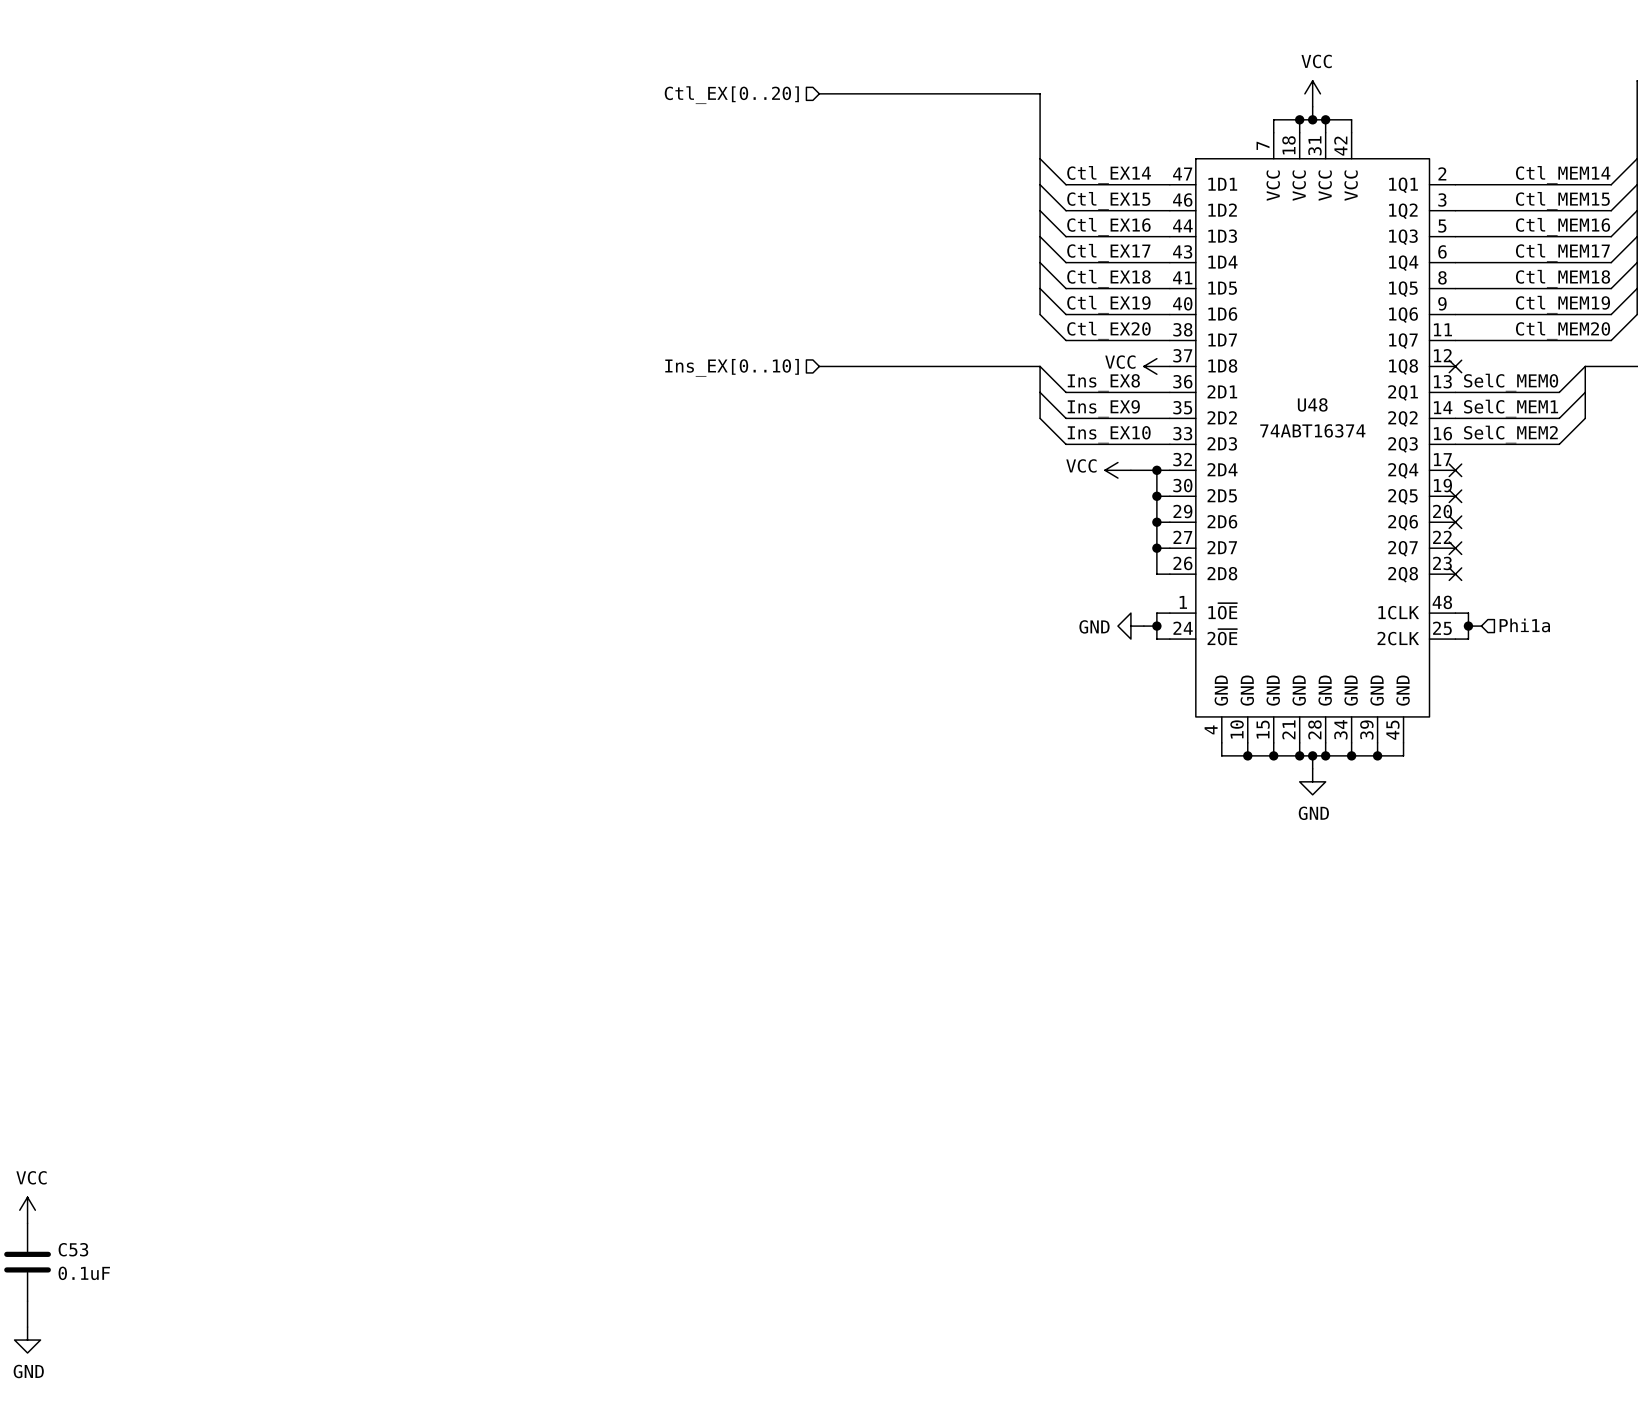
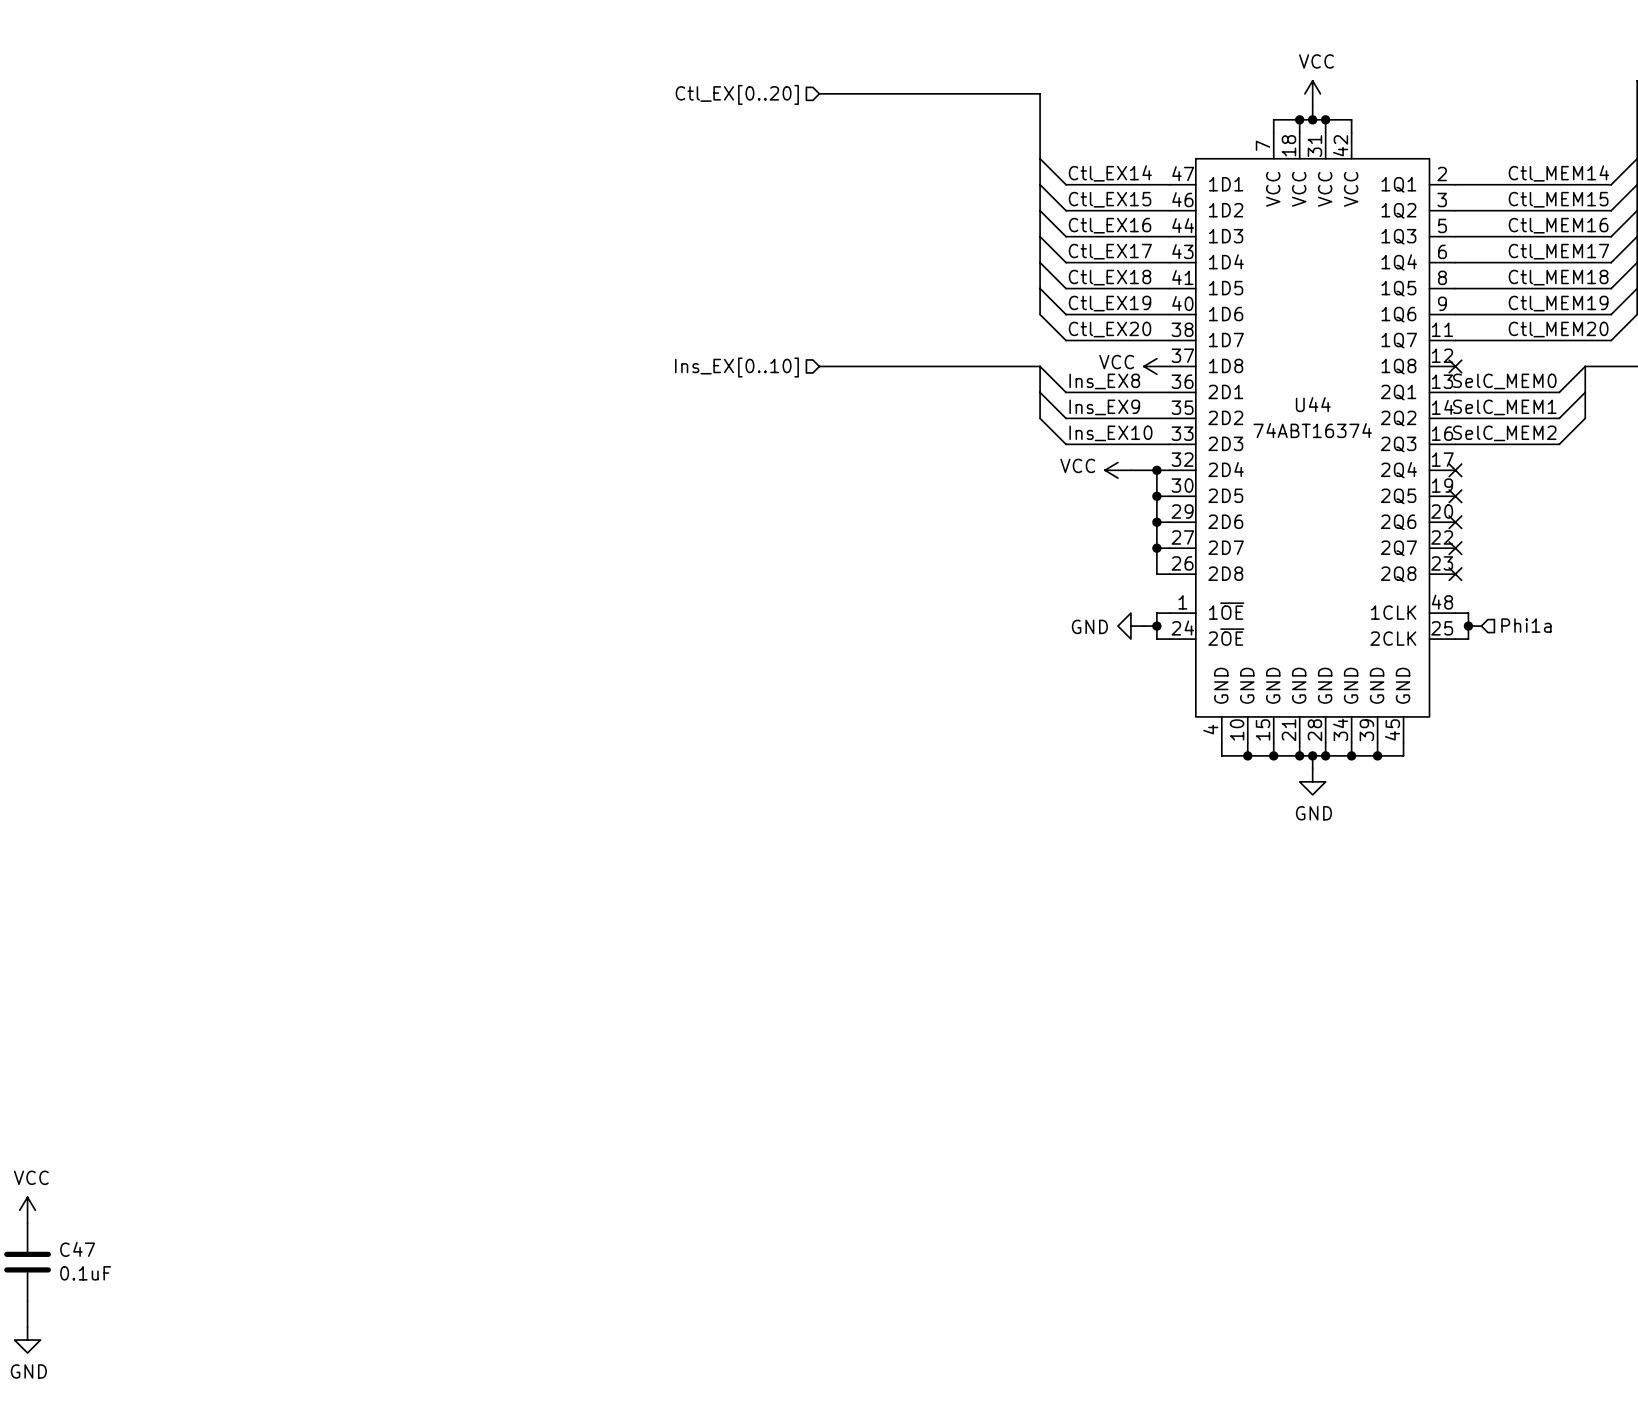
U48 name: U48 (1312, 404) -> U44 (1313, 404)
C53 name: C53 (73, 1249) -> C47 (77, 1249)

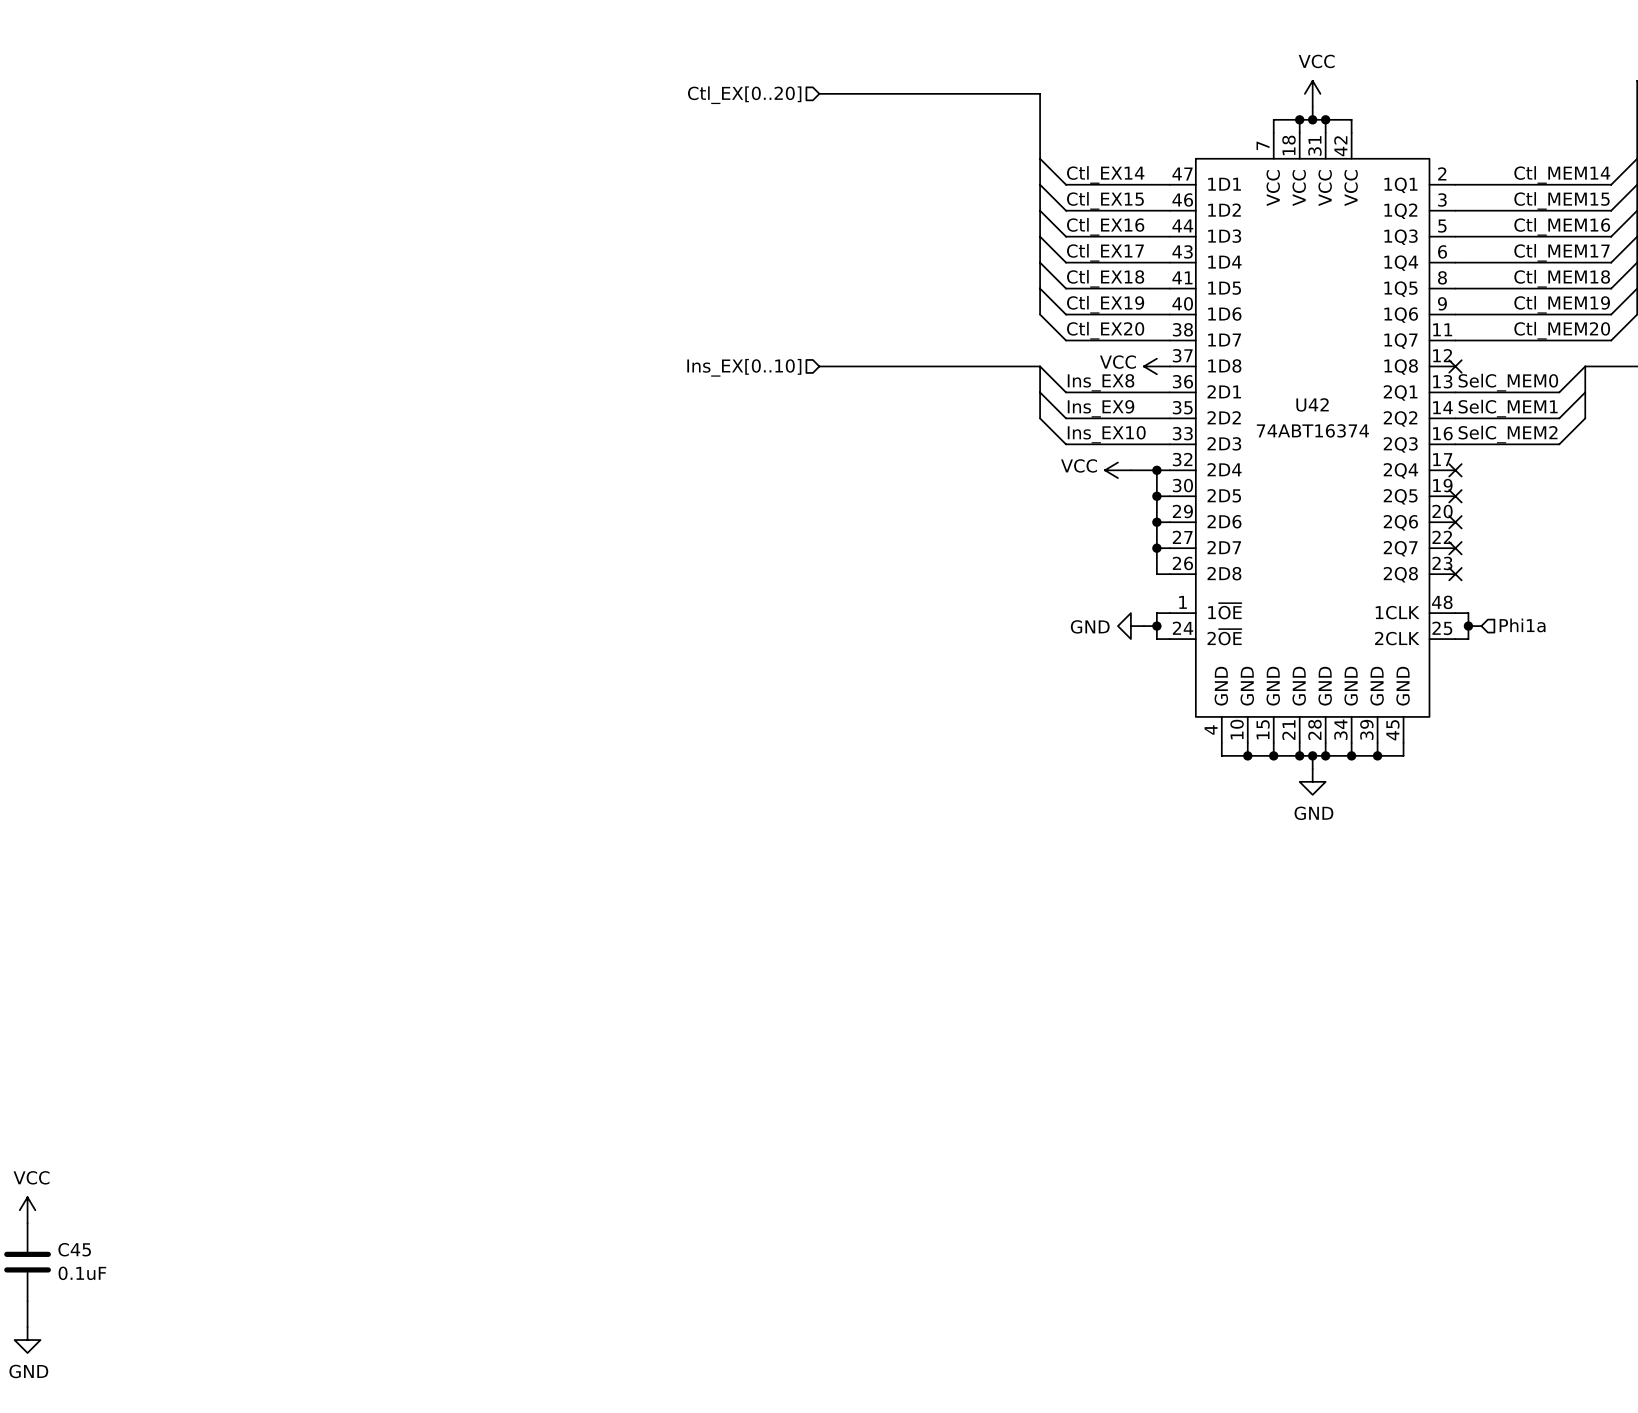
U44 name: U44 (1313, 404) -> U42 (1312, 404)
C47 name: C47 (77, 1249) -> C45 (74, 1249)

